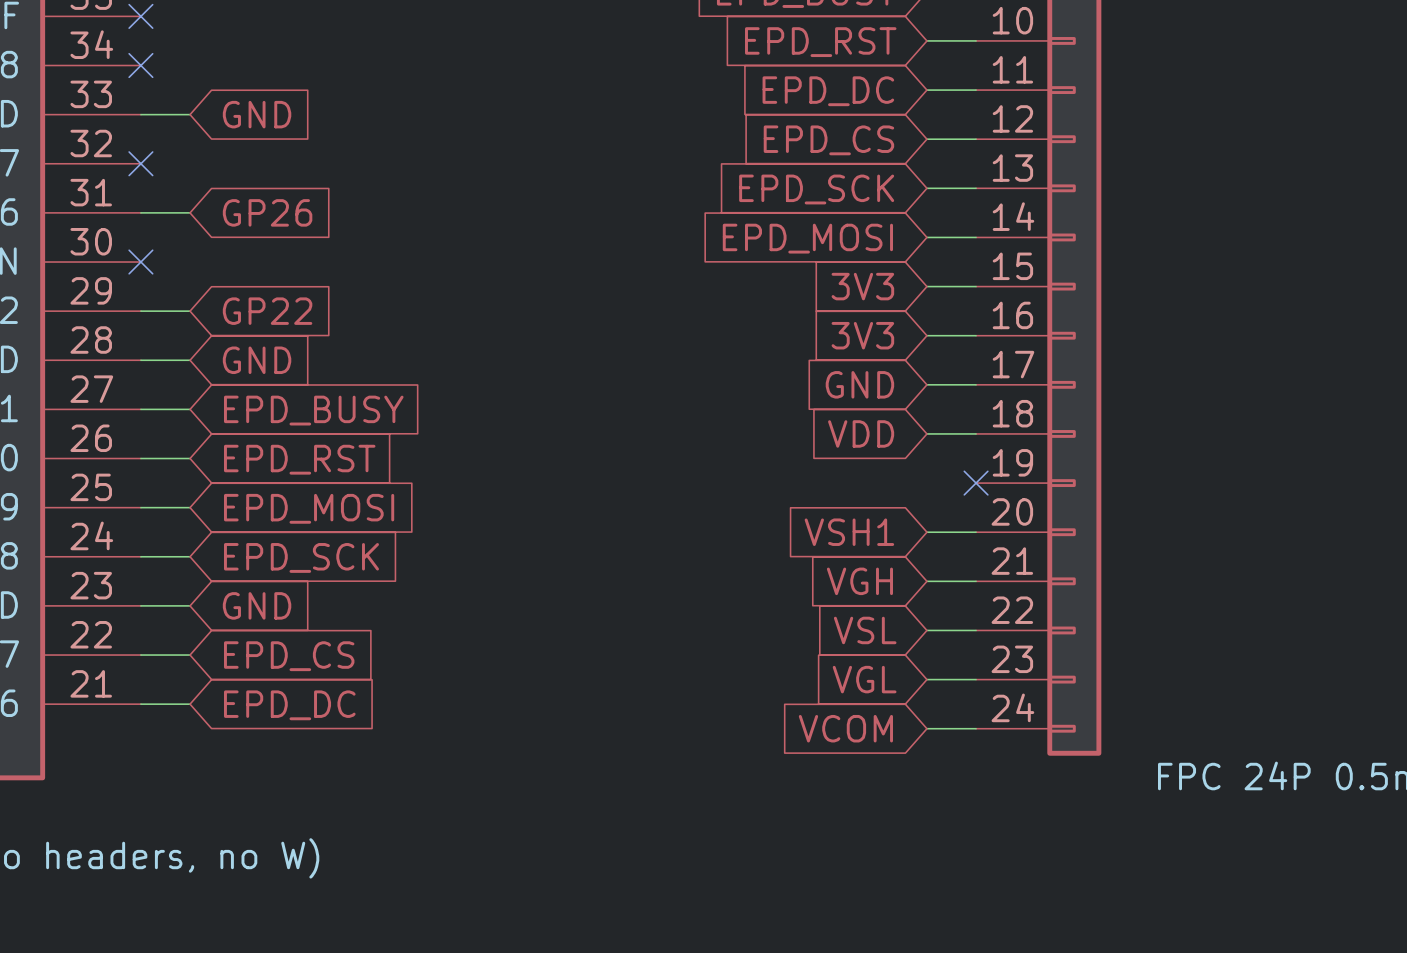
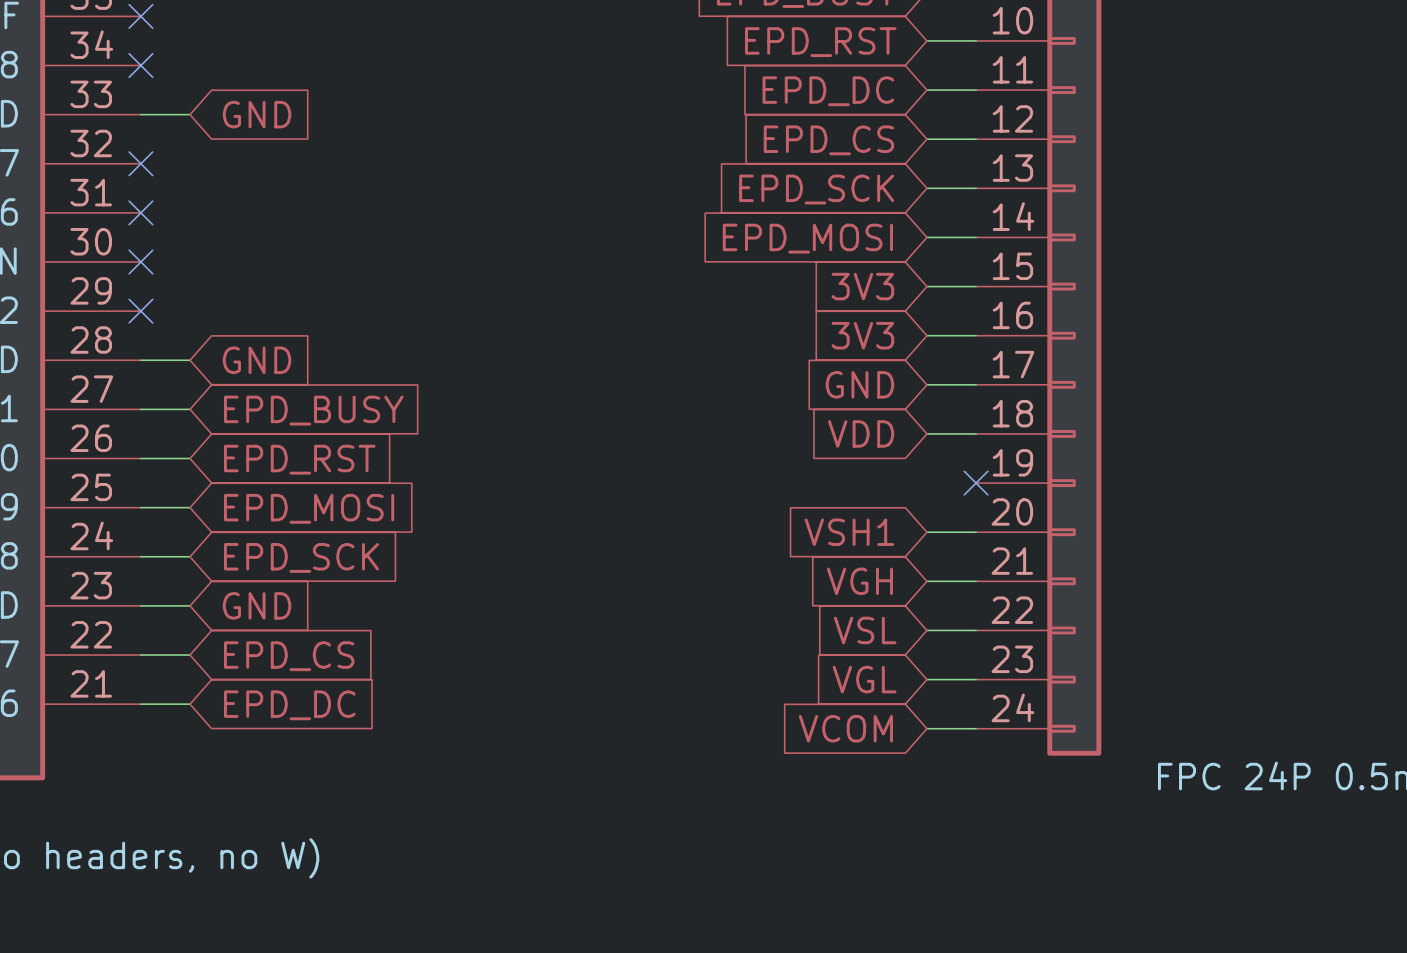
wire: (140, 212) (190, 212) -> none
no-connect mark: none -> (140, 212)
global label: GP26 (267, 212) -> none
wire: (140, 311) (190, 311) -> none
no-connect mark: none -> (140, 311)
global label: GP22 (267, 311) -> none

